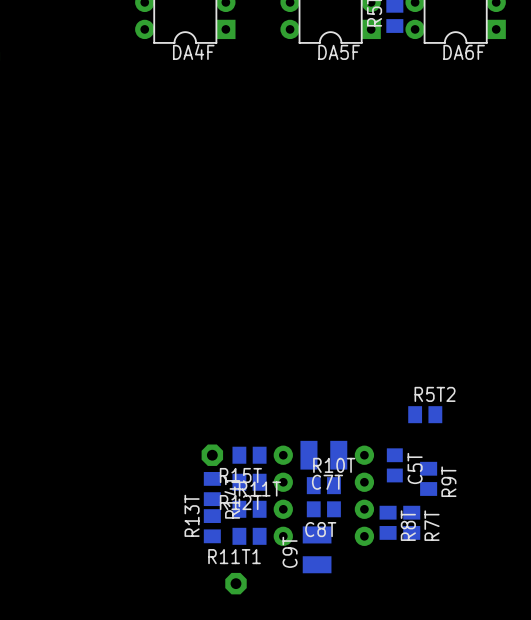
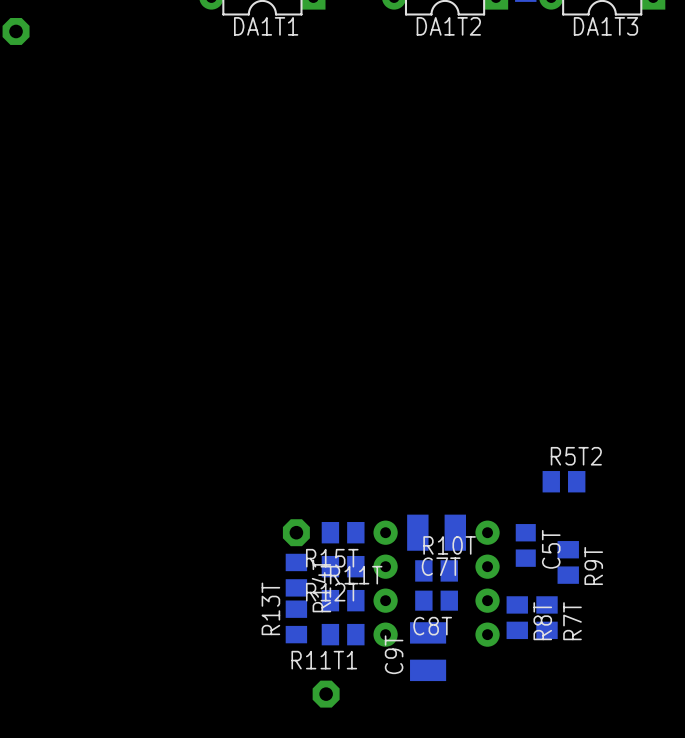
DA4F name: DA4F (193, 52) -> DA1T1 (266, 26)
DA5F name: DA5F (339, 52) -> DA1T2 (448, 26)
DA6F name: DA6F (464, 52) -> DA1T3 (605, 26)

